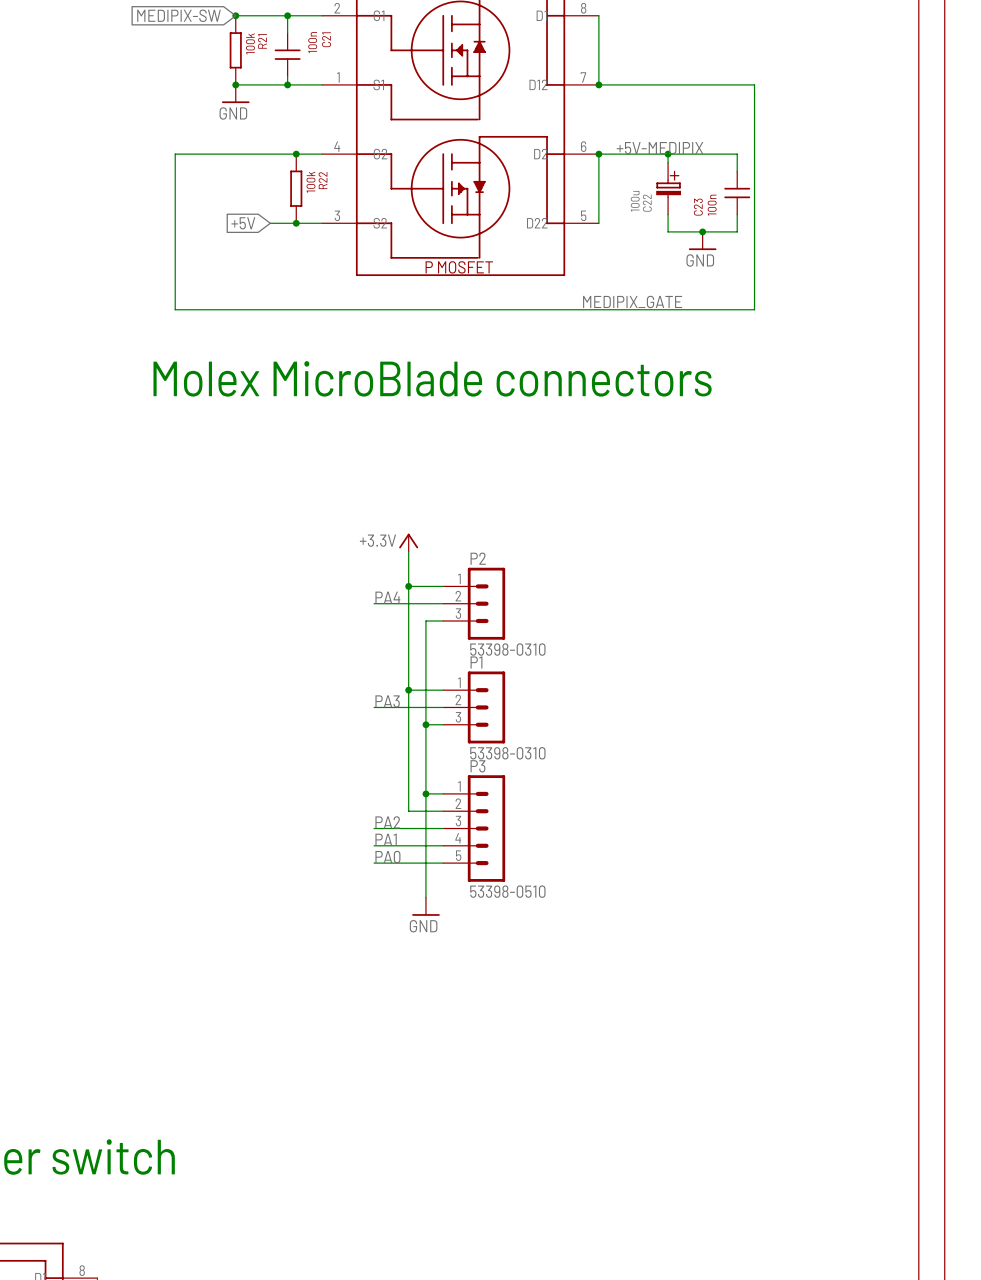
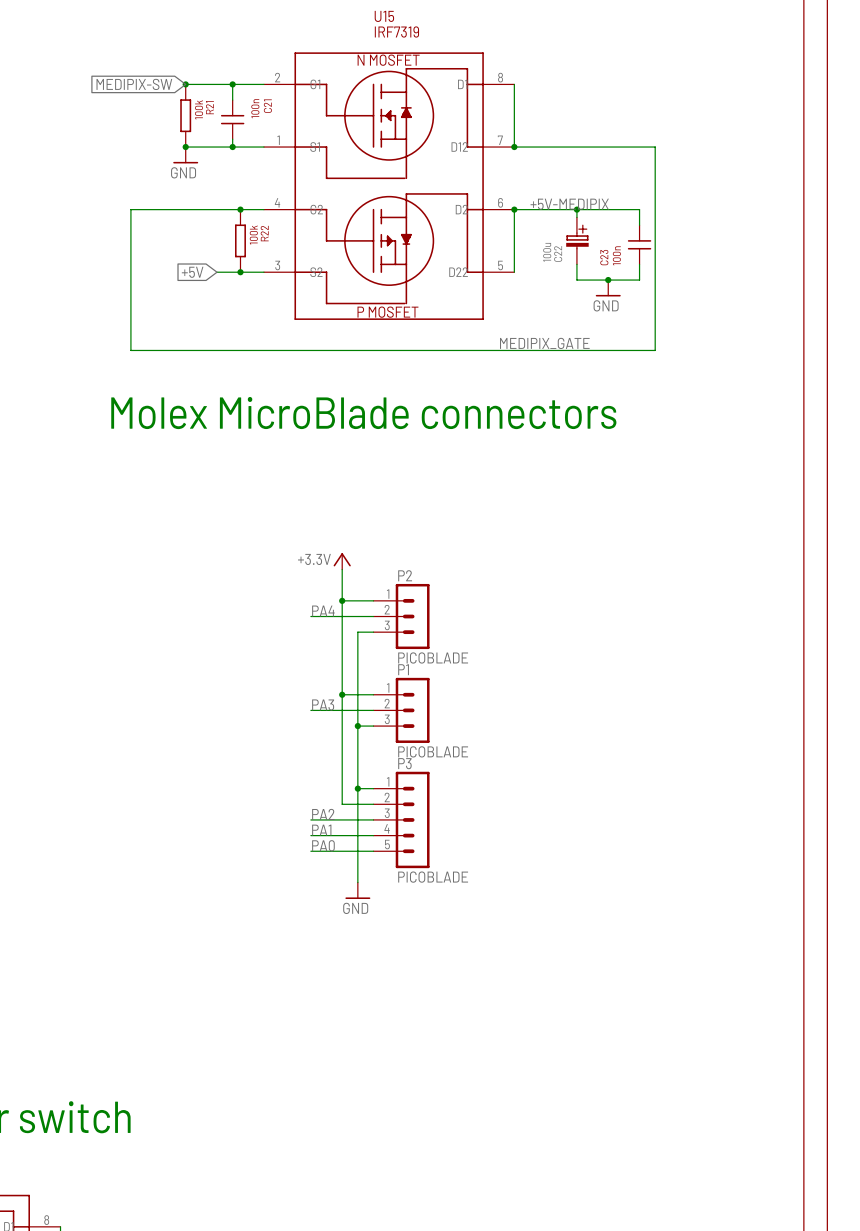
P2 value: 53398-0310 (507, 649) -> PICOBLADE (433, 657)
P1 value: 53398-0310 (507, 753) -> PICOBLADE (433, 751)
P3 value: 53398-0510 (507, 891) -> PICOBLADE (433, 877)

